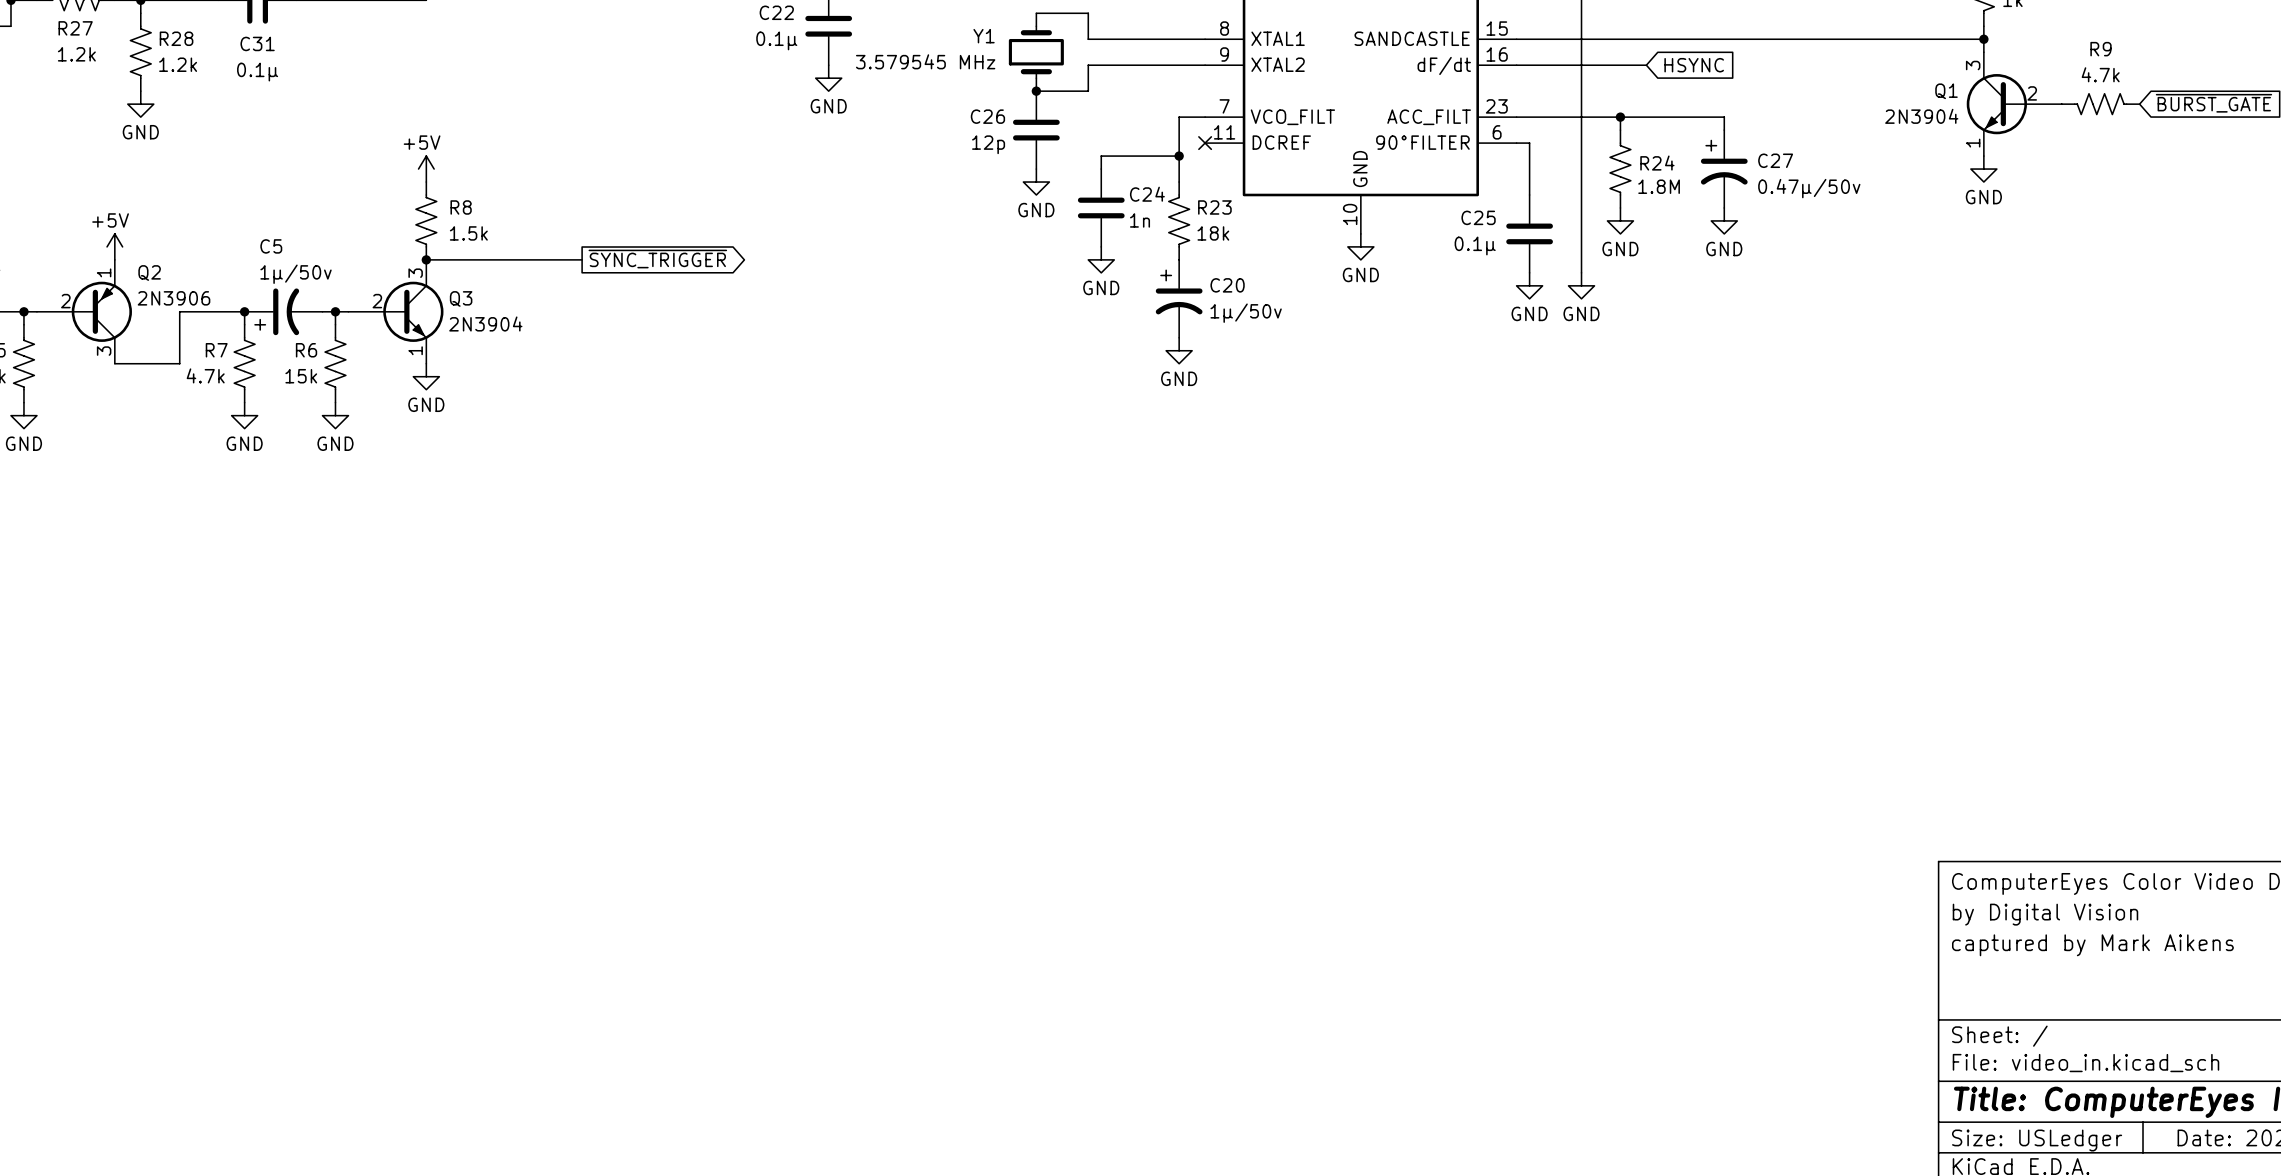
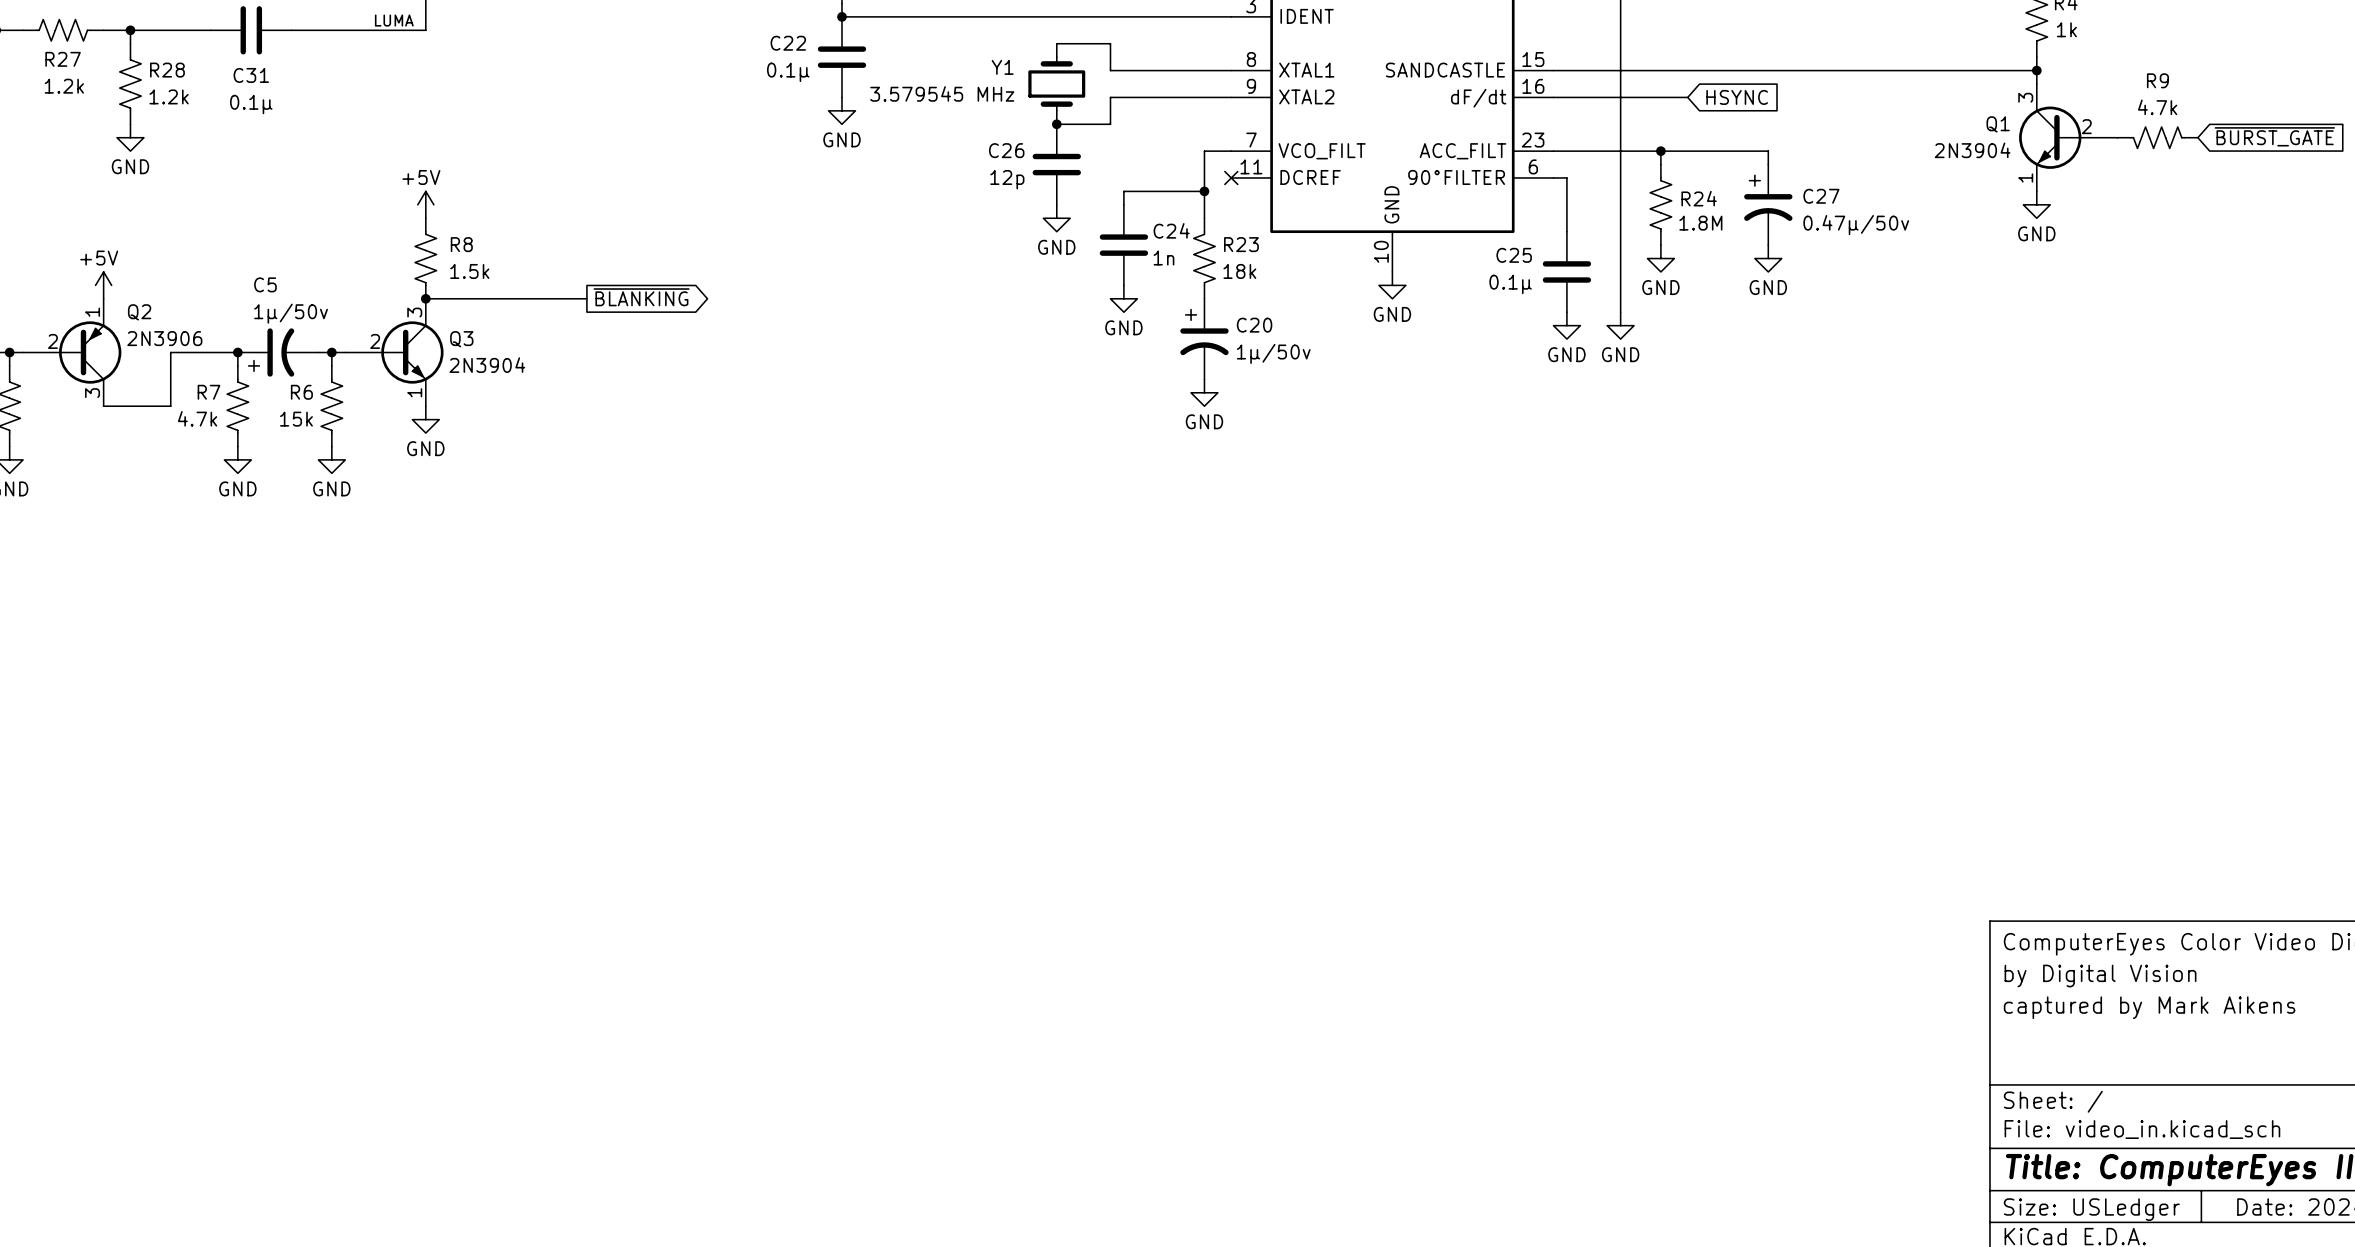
global label: ~{SYNC_TRIGGER} (657, 259) -> ~{BLANKING} (641, 297)

